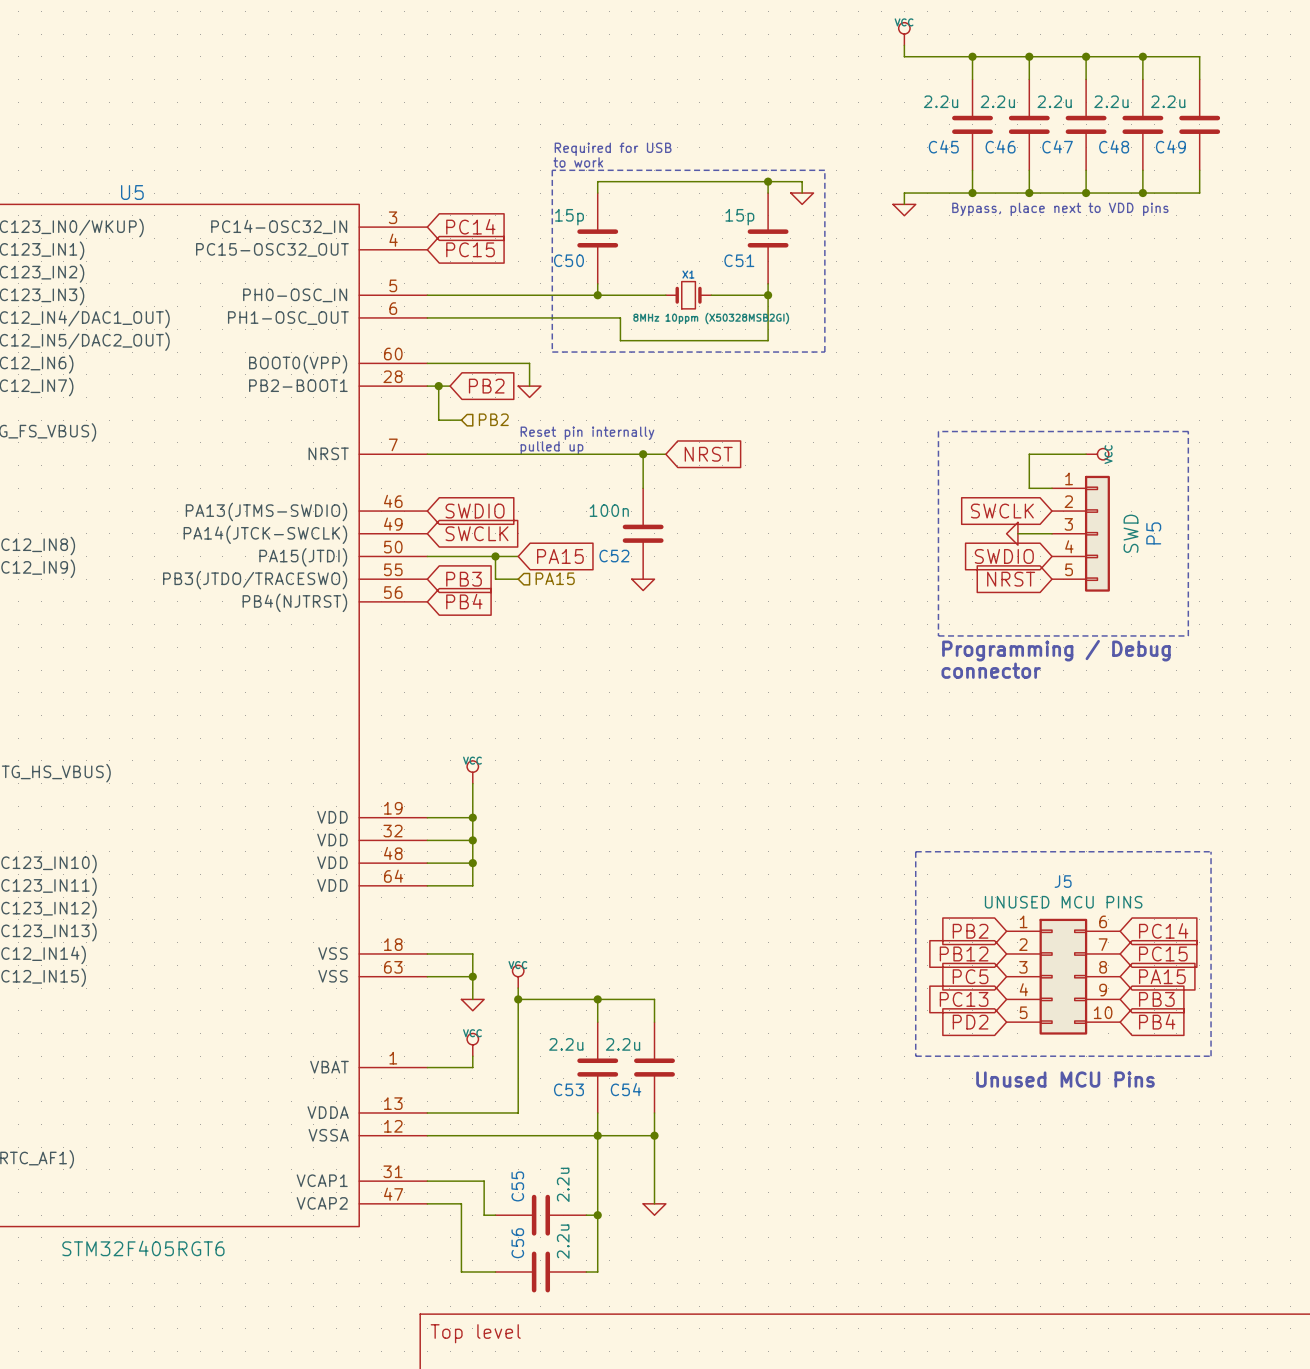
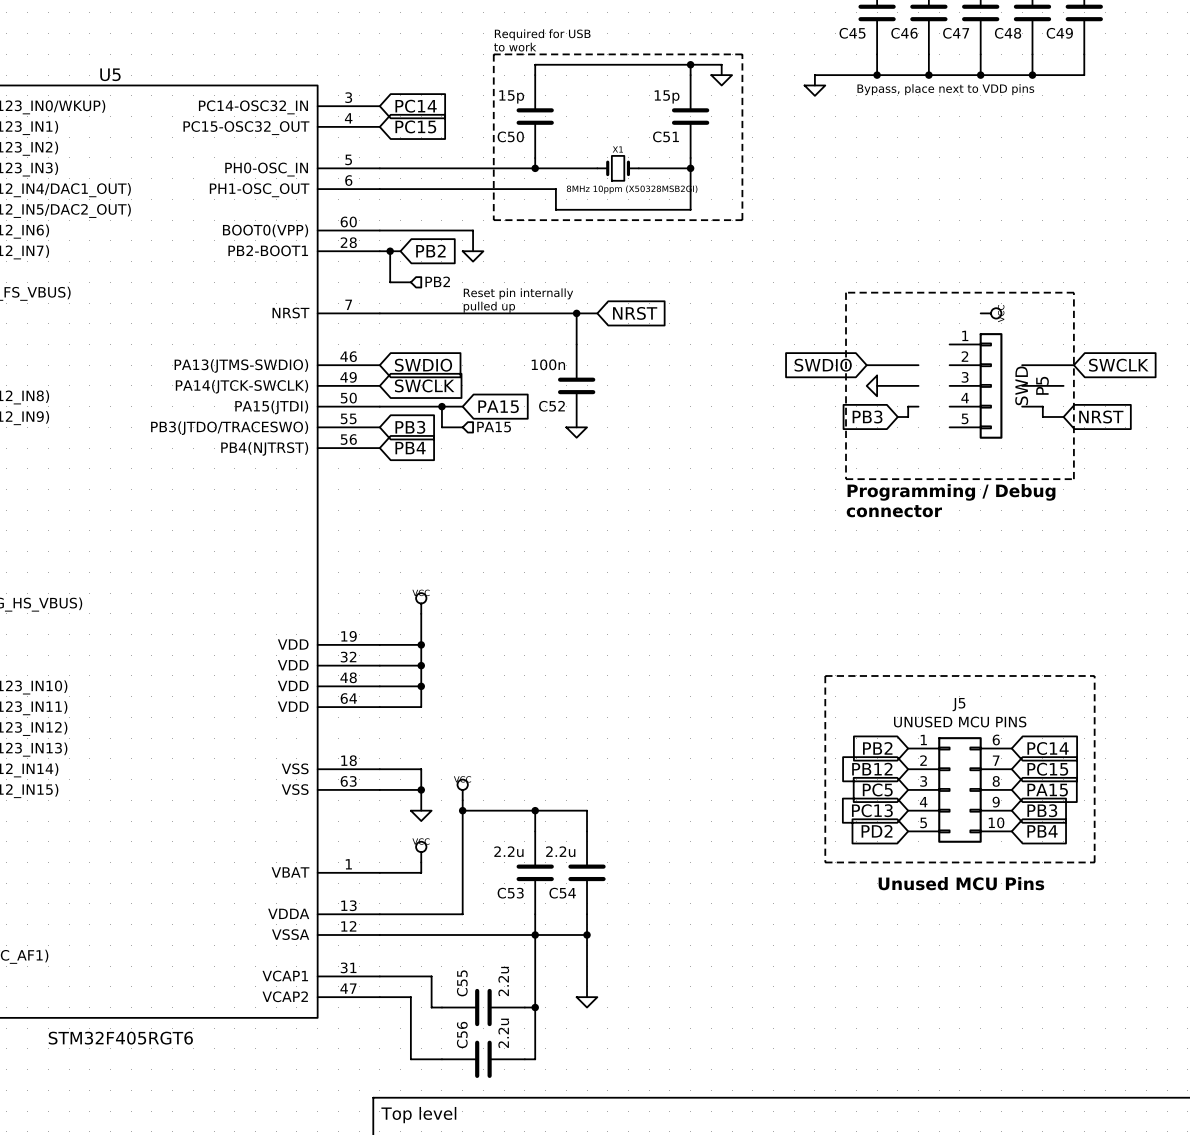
wire: (1086, 454) (1029, 454) (1029, 488) (1052, 488) -> none
wire: none -> (866, 365) (918, 365)
global label rotation: 0° (1002, 511) -> 180° (1118, 365)
global label position: SWCLK (1002, 511) -> SWCLK (1118, 365)
wire: none -> (1022, 365) (1073, 365)
power symbol position: (1012, 533) -> (871, 385)
wire: (1017, 533) (1052, 533) -> (918, 385) (877, 385)
wire: none -> (1022, 385) (1063, 385)
global label position: SWDIO (1004, 556) -> SWDIO (823, 365)
wire: none -> (918, 406) (908, 406) (908, 416) (897, 416)
wire: none -> (1022, 406) (1042, 406) (1042, 416) (1063, 416)
global label: none -> PB3 (867, 417)
global label rotation: 0° (1011, 579) -> 180° (1101, 417)
global label position: NRST (1011, 579) -> NRST (1101, 417)

